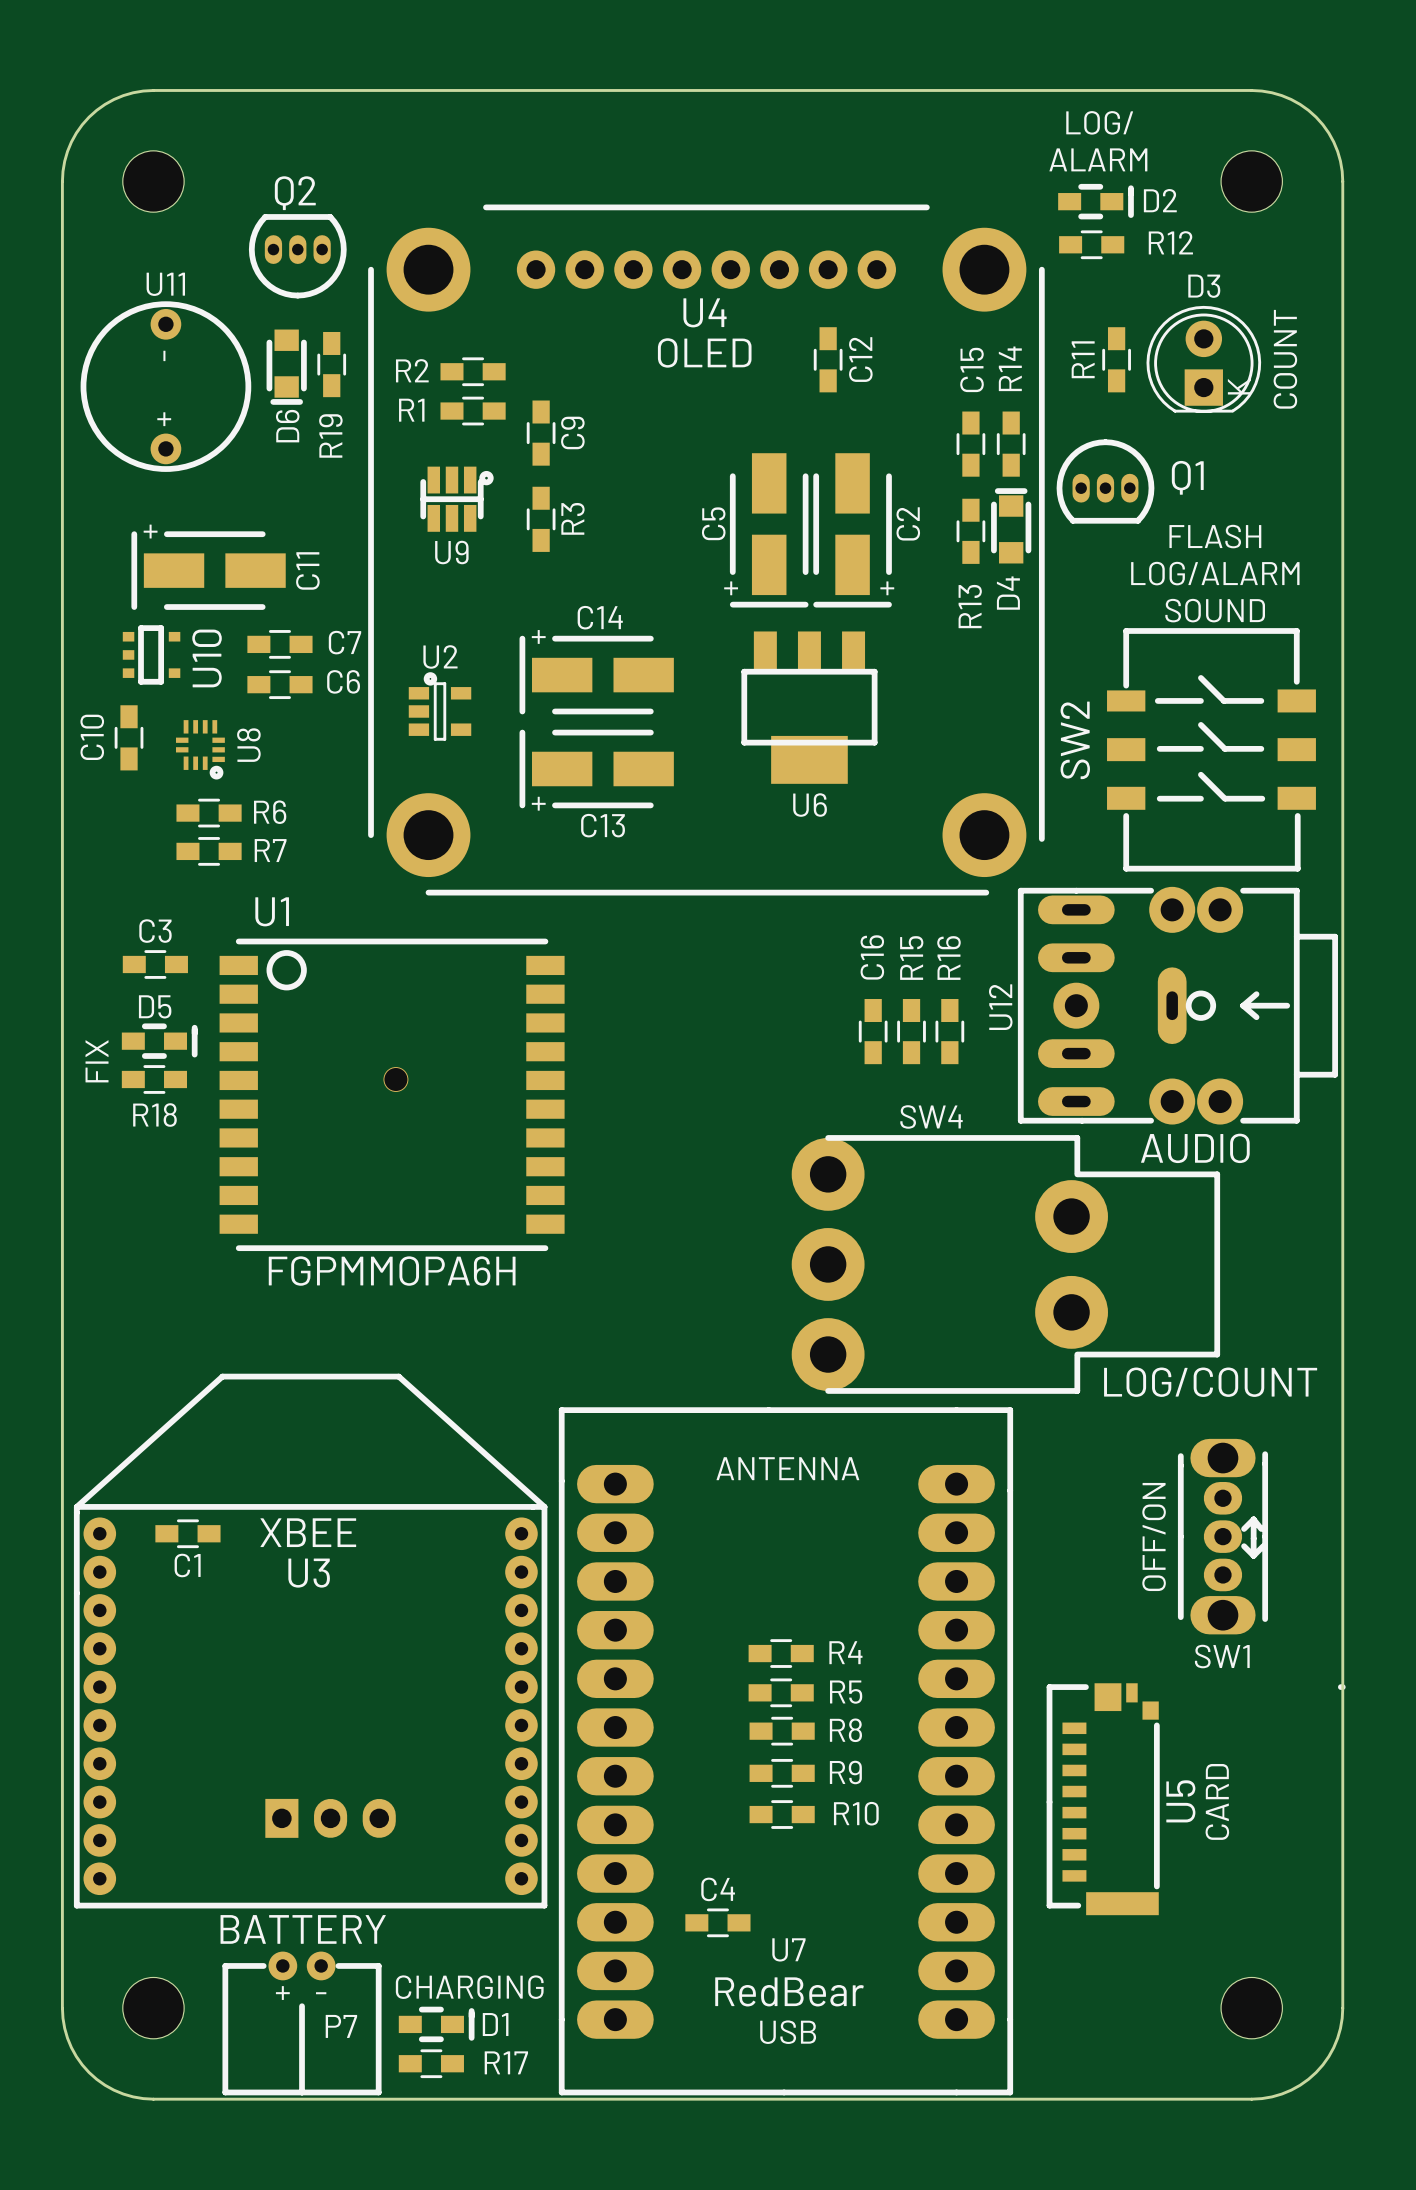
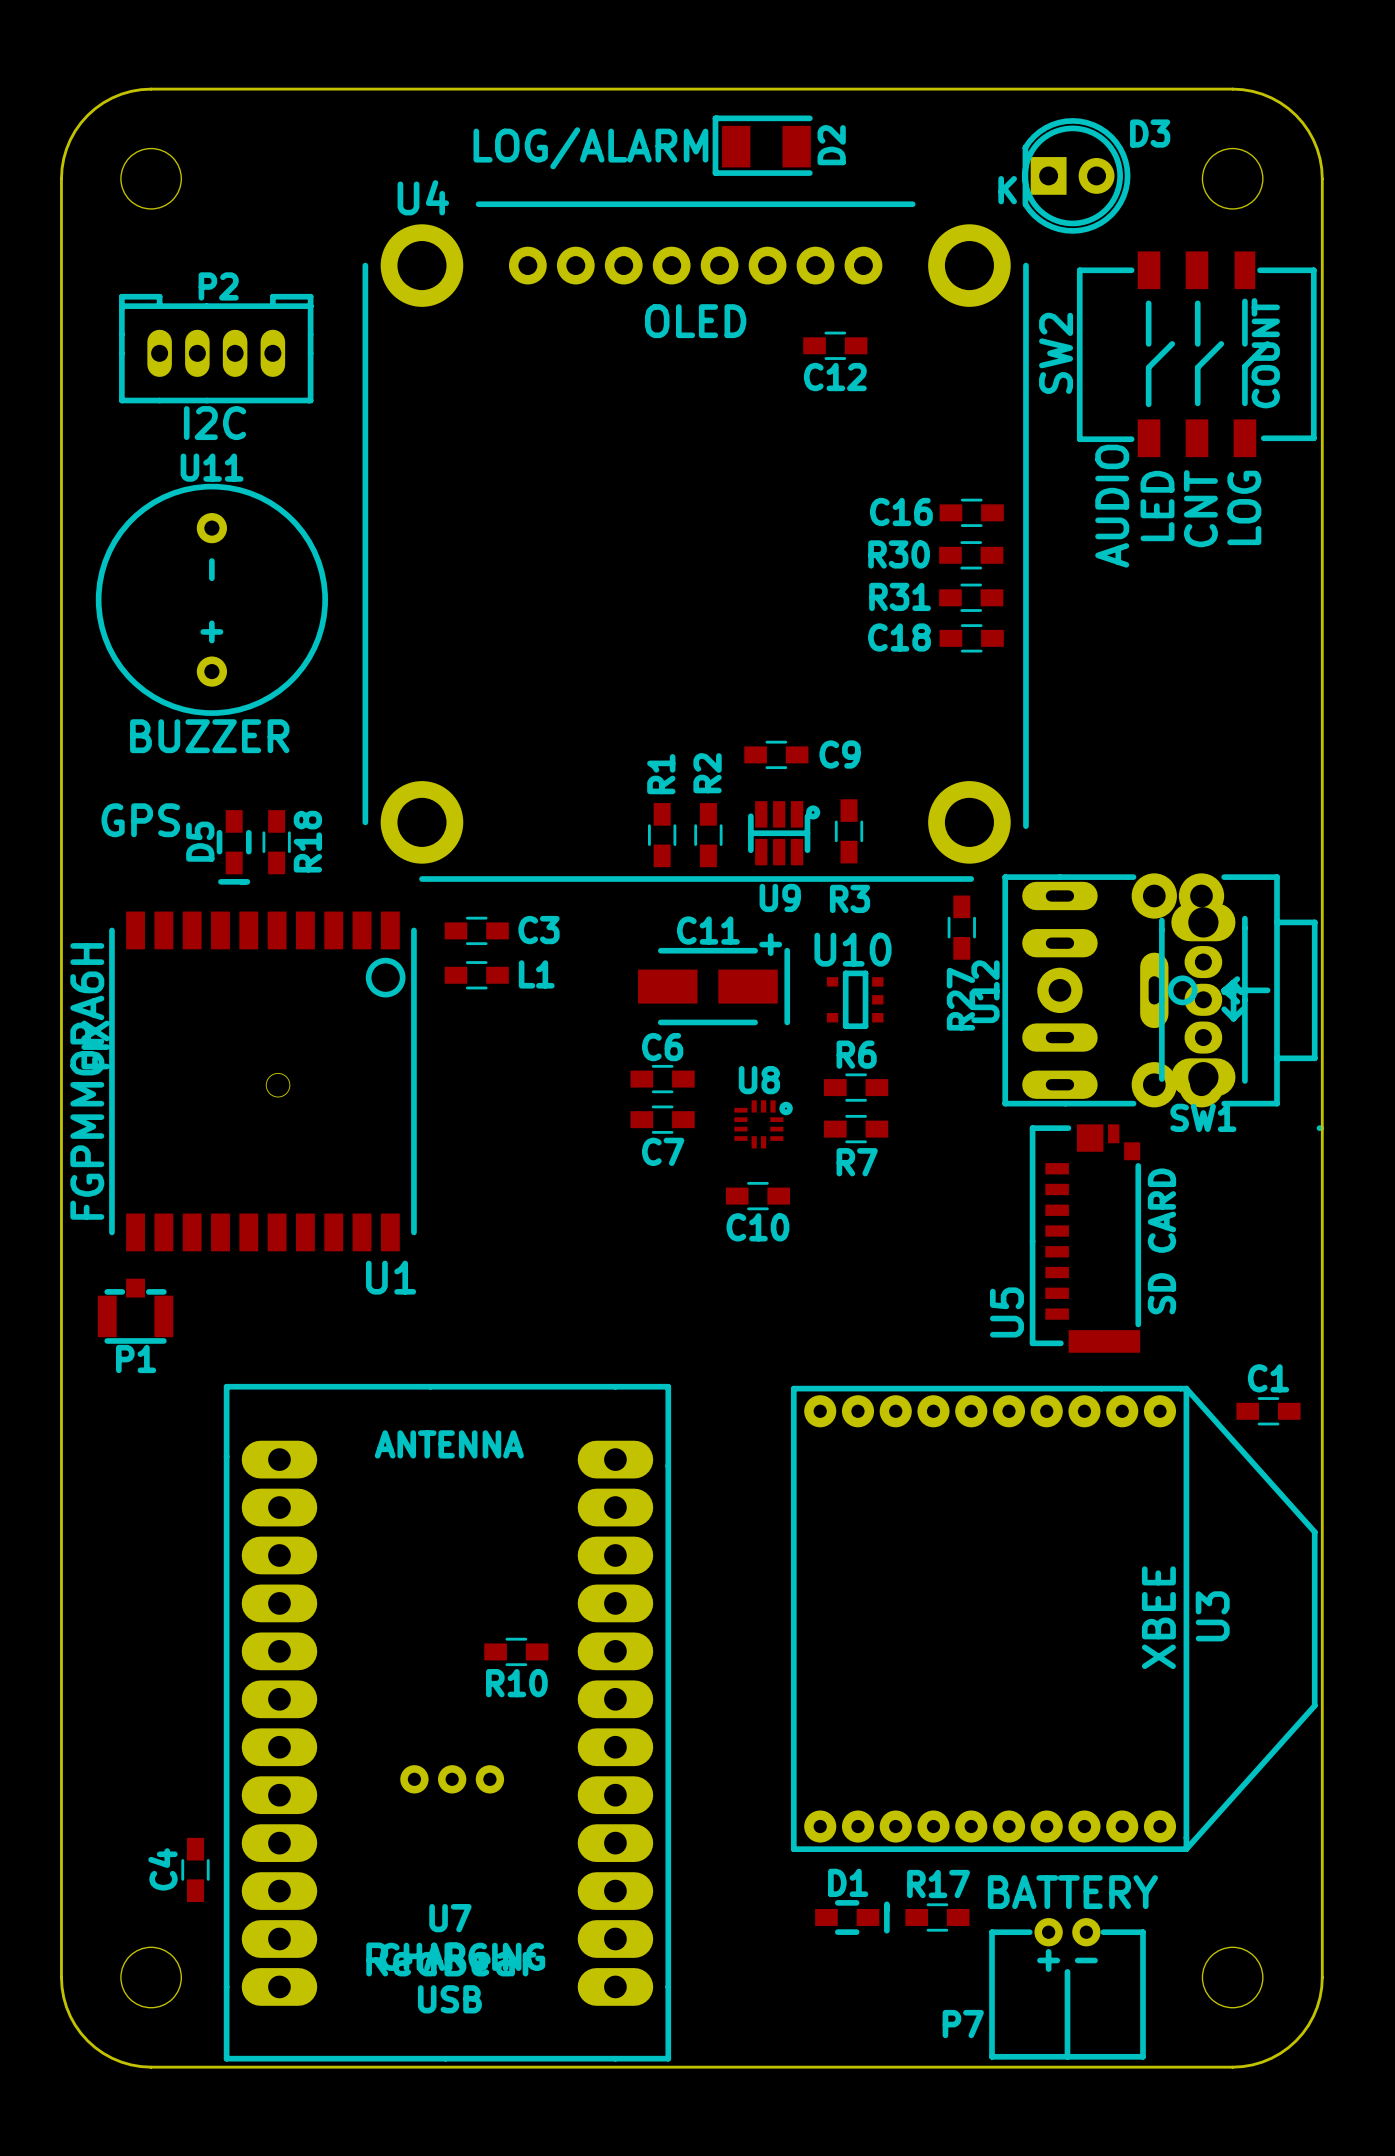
text: LOG/ (1099, 122) -> none
text: none -> LOG/ALARM (590, 148)
text: ALARM (1098, 159) -> none
D2 footprint: [1058, 183, 1134, 220] -> [712, 115, 813, 176]
R12: (1091, 244) -> none
Q2: (297, 256) -> none
D3 name position: D3 (1204, 286) -> D3 (1150, 133)
U11 footprint: [80, 301, 252, 472] -> [95, 483, 328, 716]
D3 footprint: [1146, 305, 1262, 413] -> [1022, 118, 1131, 234]
U4 name position: U4 (705, 312) -> U4 (423, 197)
U4 text position: OLED (704, 352) -> OLED (695, 321)
P2: none -> (216, 348)
C12 rotation: 0° (828, 359) -> 90° clockwise (835, 345)
R11: (1116, 359) -> none
R19: (331, 364) -> none
D6: (286, 367) -> none
R2 rotation: 0° (473, 371) -> 90° clockwise (708, 835)
R2 position: (473, 371) -> (708, 835)
R1 rotation: 0° (473, 411) -> 90° clockwise (662, 835)
R1 position: (473, 411) -> (662, 835)
text: none -> I2C (215, 423)
C9 rotation: 0° (541, 433) -> 90° clockwise (776, 754)
C9 position: (541, 433) -> (776, 754)
C15: (970, 444) -> none
R14: (1011, 444) -> none
Q1: (1105, 481) -> none
U9 position: (457, 499) -> (784, 833)
text: none -> AUDIO (1112, 506)
text: none -> LED (1157, 506)
text: none -> LOG (1244, 507)
text: none -> CNT (1200, 508)
R3 name rotation: 0° (572, 518) -> 90° clockwise (850, 898)
R3 name position: R3 (572, 518) -> R3 (850, 898)
R3 position: (541, 519) -> (849, 831)
D4: (1011, 525) -> none
C5: (769, 530) -> none
C2: (852, 530) -> none
C11 footprint: [131, 531, 286, 610] -> [638, 947, 791, 1026]
R13: (970, 531) -> none
text: FLASH (1215, 536) -> none
U9 name position: U9 (451, 552) -> U9 (780, 897)
R30: none -> (971, 555)
C11 name position: C11 (307, 570) -> C11 (708, 930)
text: LOG/ALARM (1215, 573) -> none
R31: none -> (971, 597)
text: SOUND (1215, 610) -> none
C7 name position: C7 (344, 642) -> C7 (663, 1151)
C7 position: (279, 644) -> (662, 1119)
C18: none -> (971, 638)
U10 rotation: 0° (151, 654) -> 180° (855, 999)
U10 position: (151, 654) -> (855, 999)
U10 name position: U10 (207, 658) -> U10 (852, 949)
C14: (596, 675) -> none
C6 name position: C6 (343, 681) -> C6 (662, 1047)
C6 position: (279, 684) -> (662, 1079)
U2: (440, 706) -> none
U6: (809, 707) -> none
C10 name position: C10 (92, 737) -> C10 (757, 1227)
C10 rotation: 0° (129, 737) -> 90° clockwise (757, 1196)
C10 position: (129, 737) -> (757, 1196)
text: none -> BUZZER (209, 736)
U8 rotation: 0° (200, 749) -> 90° counterclockwise (763, 1124)
U8 position: (200, 749) -> (763, 1124)
SW2 rotation: 0° (1211, 749) -> 90° clockwise (1196, 354)
SW2 position: (1211, 749) -> (1196, 354)
C13: (596, 768) -> none
R6 name position: R6 (270, 812) -> R6 (856, 1054)
R6 position: (209, 813) -> (856, 1087)
text: none -> GPS (140, 820)
R7 name position: R7 (270, 850) -> R7 (857, 1162)
R7 position: (209, 851) -> (856, 1129)
U1 name position: U1 (272, 911) -> U1 (391, 1277)
C3 name position: C3 (155, 931) -> C3 (539, 930)
R27: none -> (961, 927)
C16 name position: C16 (872, 957) -> C16 (901, 511)
C3 position: (155, 964) -> (476, 930)
L1: none -> (476, 975)
D5 name position: D5 (155, 1006) -> D5 (200, 841)
C16 rotation: 0° (873, 1031) -> 90° clockwise (971, 512)
C16 position: (873, 1031) -> (971, 512)
R15: (911, 1031) -> none
R16: (949, 1031) -> none
D5 rotation: 0° (159, 1041) -> 90° clockwise (234, 847)
D5 position: (159, 1041) -> (234, 847)
R18 rotation: 0° (154, 1079) -> 90° clockwise (276, 842)
R18 position: (154, 1079) -> (276, 842)
U1 rotation: 0° (392, 1094) -> 90° clockwise (262, 1081)
R18 name position: R18 (154, 1115) -> R18 (307, 841)
text: AUDIO (1195, 1148) -> none
U5 text: none -> SD CARD (1161, 1241)
SW4: (1005, 1264) -> none
P1: none -> (135, 1311)
text: LOG/COUNT (1210, 1382) -> none
C1 position: (187, 1533) -> (1268, 1411)
text: OFF/ON (1154, 1536) -> none
SW1 position: (1222, 1536) -> (1203, 999)
C1 name position: C1 (187, 1565) -> C1 (1268, 1378)
U3 name position: U3 (309, 1573) -> U3 (1212, 1616)
U3 rotation: 0° (310, 1641) -> 90° clockwise (1054, 1618)
U3 position: (310, 1641) -> (1054, 1618)
R4: (781, 1653) -> none
R5: (781, 1692) -> none
R8: (782, 1731) -> none
U7 position: (785, 1751) -> (447, 1722)
R9: (782, 1773) -> none
U5 position: (1196, 1799) -> (1176, 1238)
U5 name position: U5 (1180, 1801) -> U5 (1006, 1312)
U5 text: CARD (1217, 1801) -> none
part: none -> (452, 1779)
R10 name position: R10 (856, 1813) -> R10 (516, 1683)
R10 position: (782, 1814) -> (516, 1651)
part: (330, 1818) -> none
C4 name position: C4 (718, 1889) -> C4 (162, 1869)
text: none -> BATTERY (1072, 1892)
C4 rotation: 0° (717, 1922) -> 90° clockwise (195, 1869)
C4 position: (717, 1922) -> (195, 1869)
text: BATTERY (303, 1929) -> none
P7 position: (302, 2023) -> (1067, 1988)
D1 position: (436, 2024) -> (852, 1917)
D1 name position: D1 (495, 2024) -> D1 (848, 1882)
P7 name position: P7 (341, 2026) -> P7 (963, 2024)
R17 name position: R17 (506, 2062) -> R17 (938, 1883)
R17 position: (431, 2063) -> (937, 1917)

